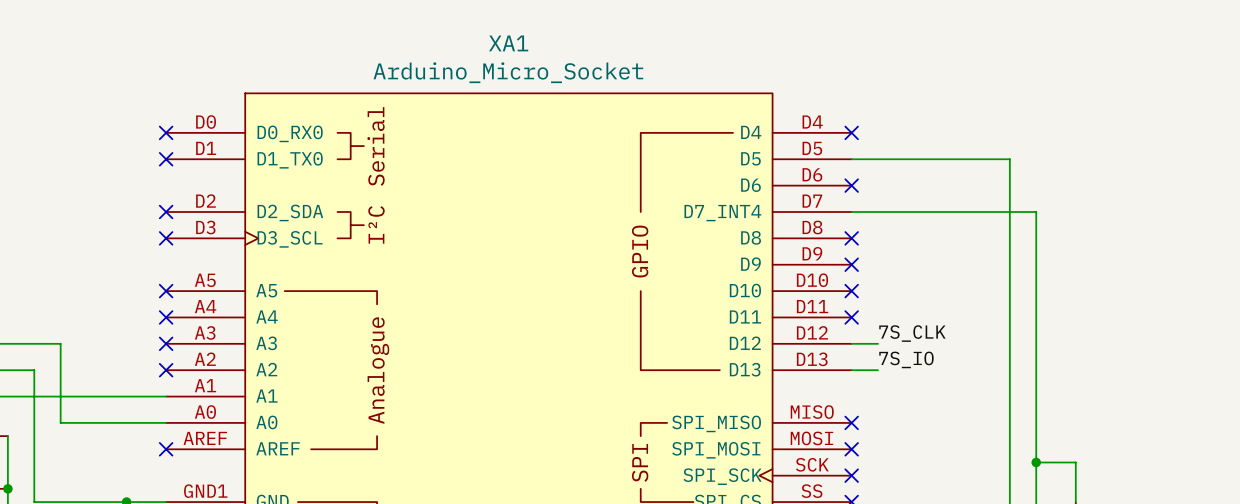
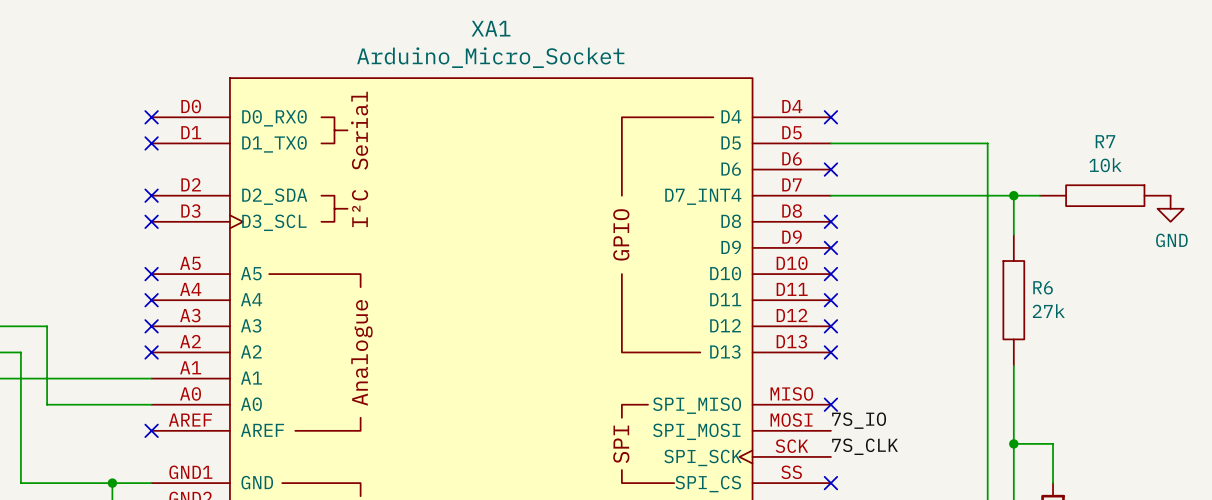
junction: none -> (1013, 195)
R7: none -> 10k (1105, 195)
power symbol: none -> GND (1170, 208)
wire: (1036, 251) (1036, 383) -> none
R6: none -> 27k (1013, 300)
label position: 7S_CLK (912, 333) -> 7S_CLK (865, 446)
wire: (851, 343) (878, 343) -> (1013, 195) (1039, 195)
no-connect mark: none -> (830, 326)
label position: 7S_IO (906, 359) -> 7S_IO (859, 420)
wire: (851, 370) (878, 370) -> none
no-connect mark: none -> (830, 352)
no-connect mark: (851, 449) -> none
no-connect mark: (851, 475) -> none

